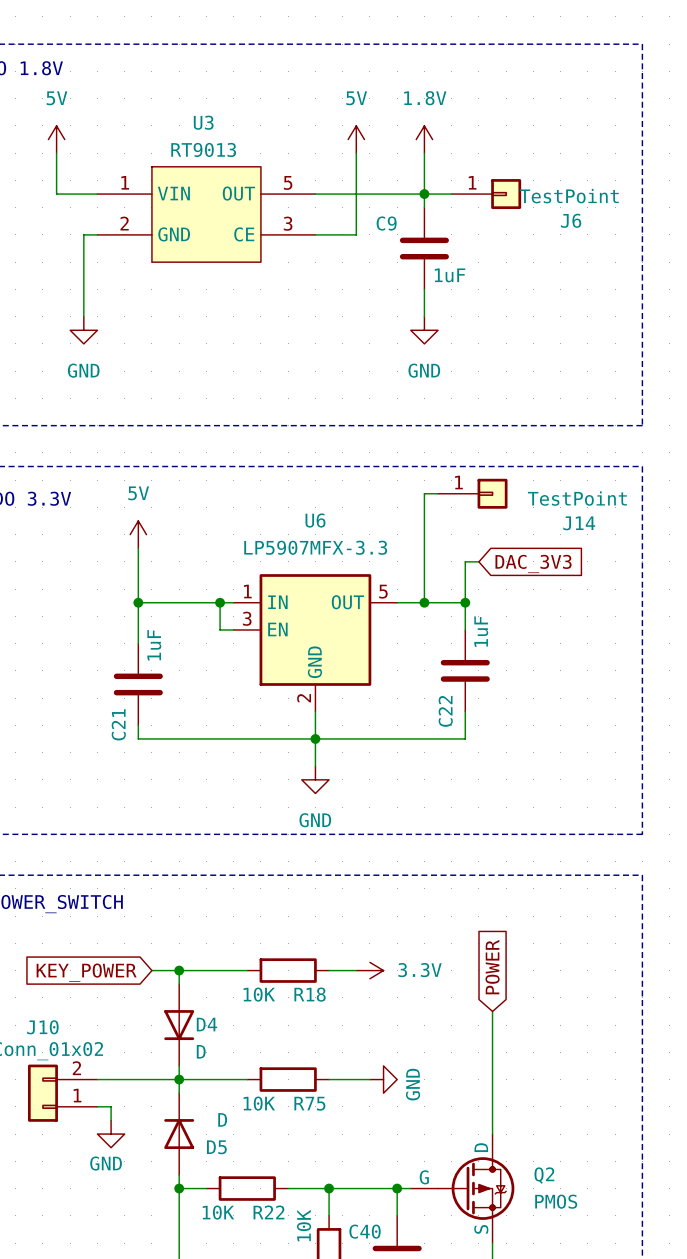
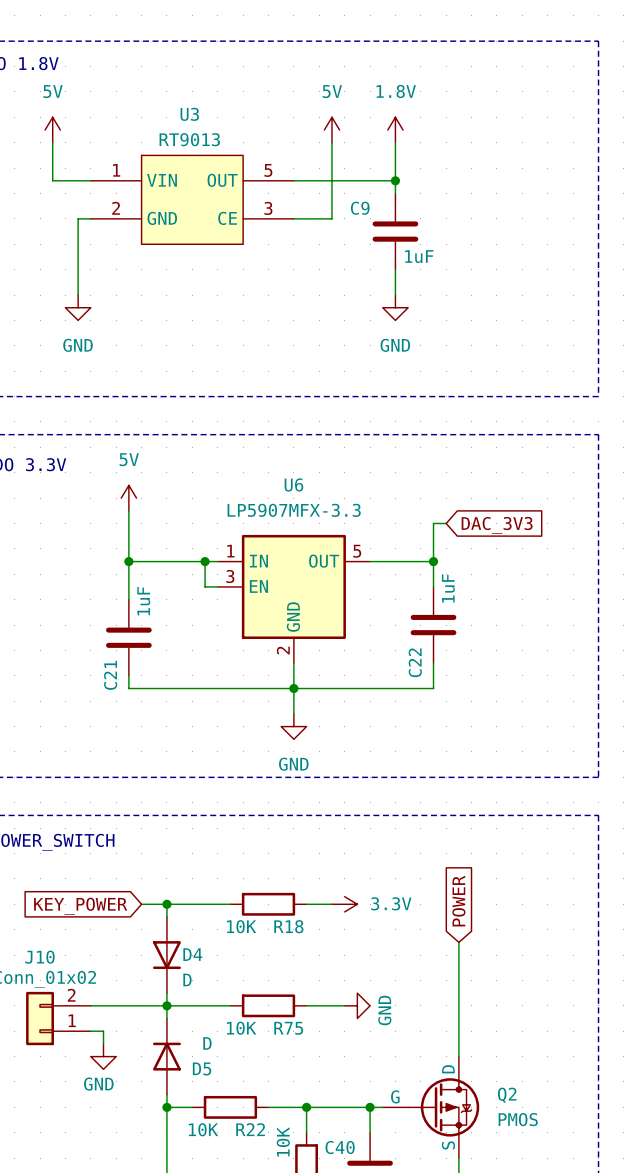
wire: (424, 194) (451, 194) -> none
J6: TestPoint (486, 194) -> none
wire: (438, 493) (424, 493) (424, 602) -> none
J14: TestPoint (472, 493) -> none
junction: (424, 602) -> none

